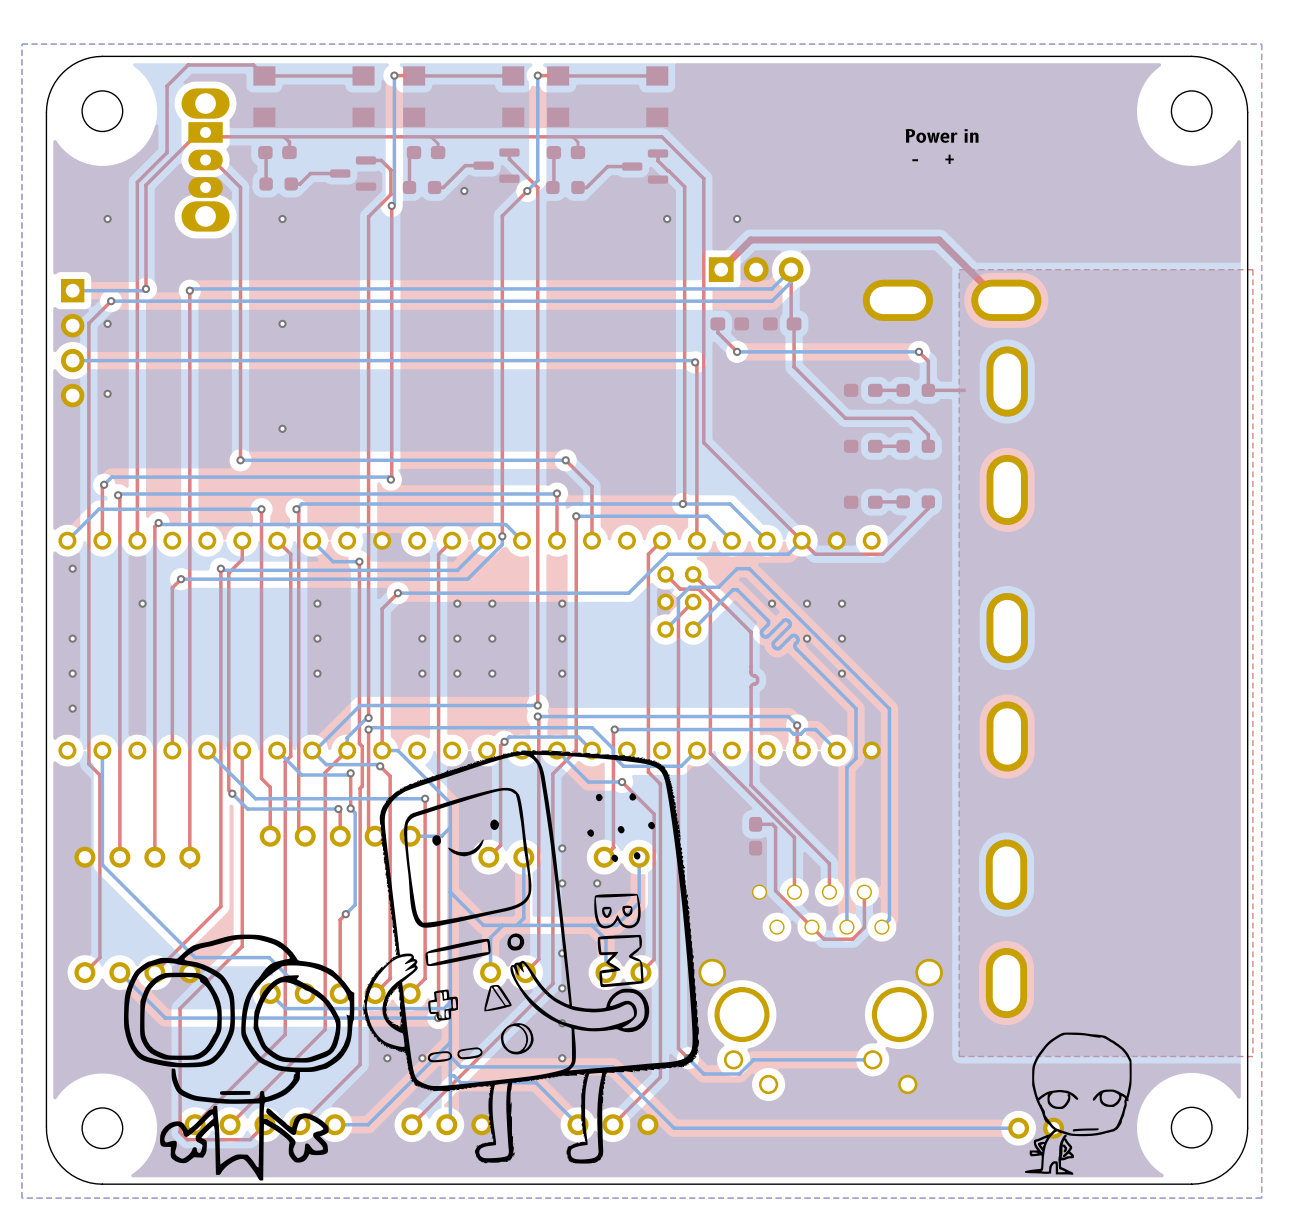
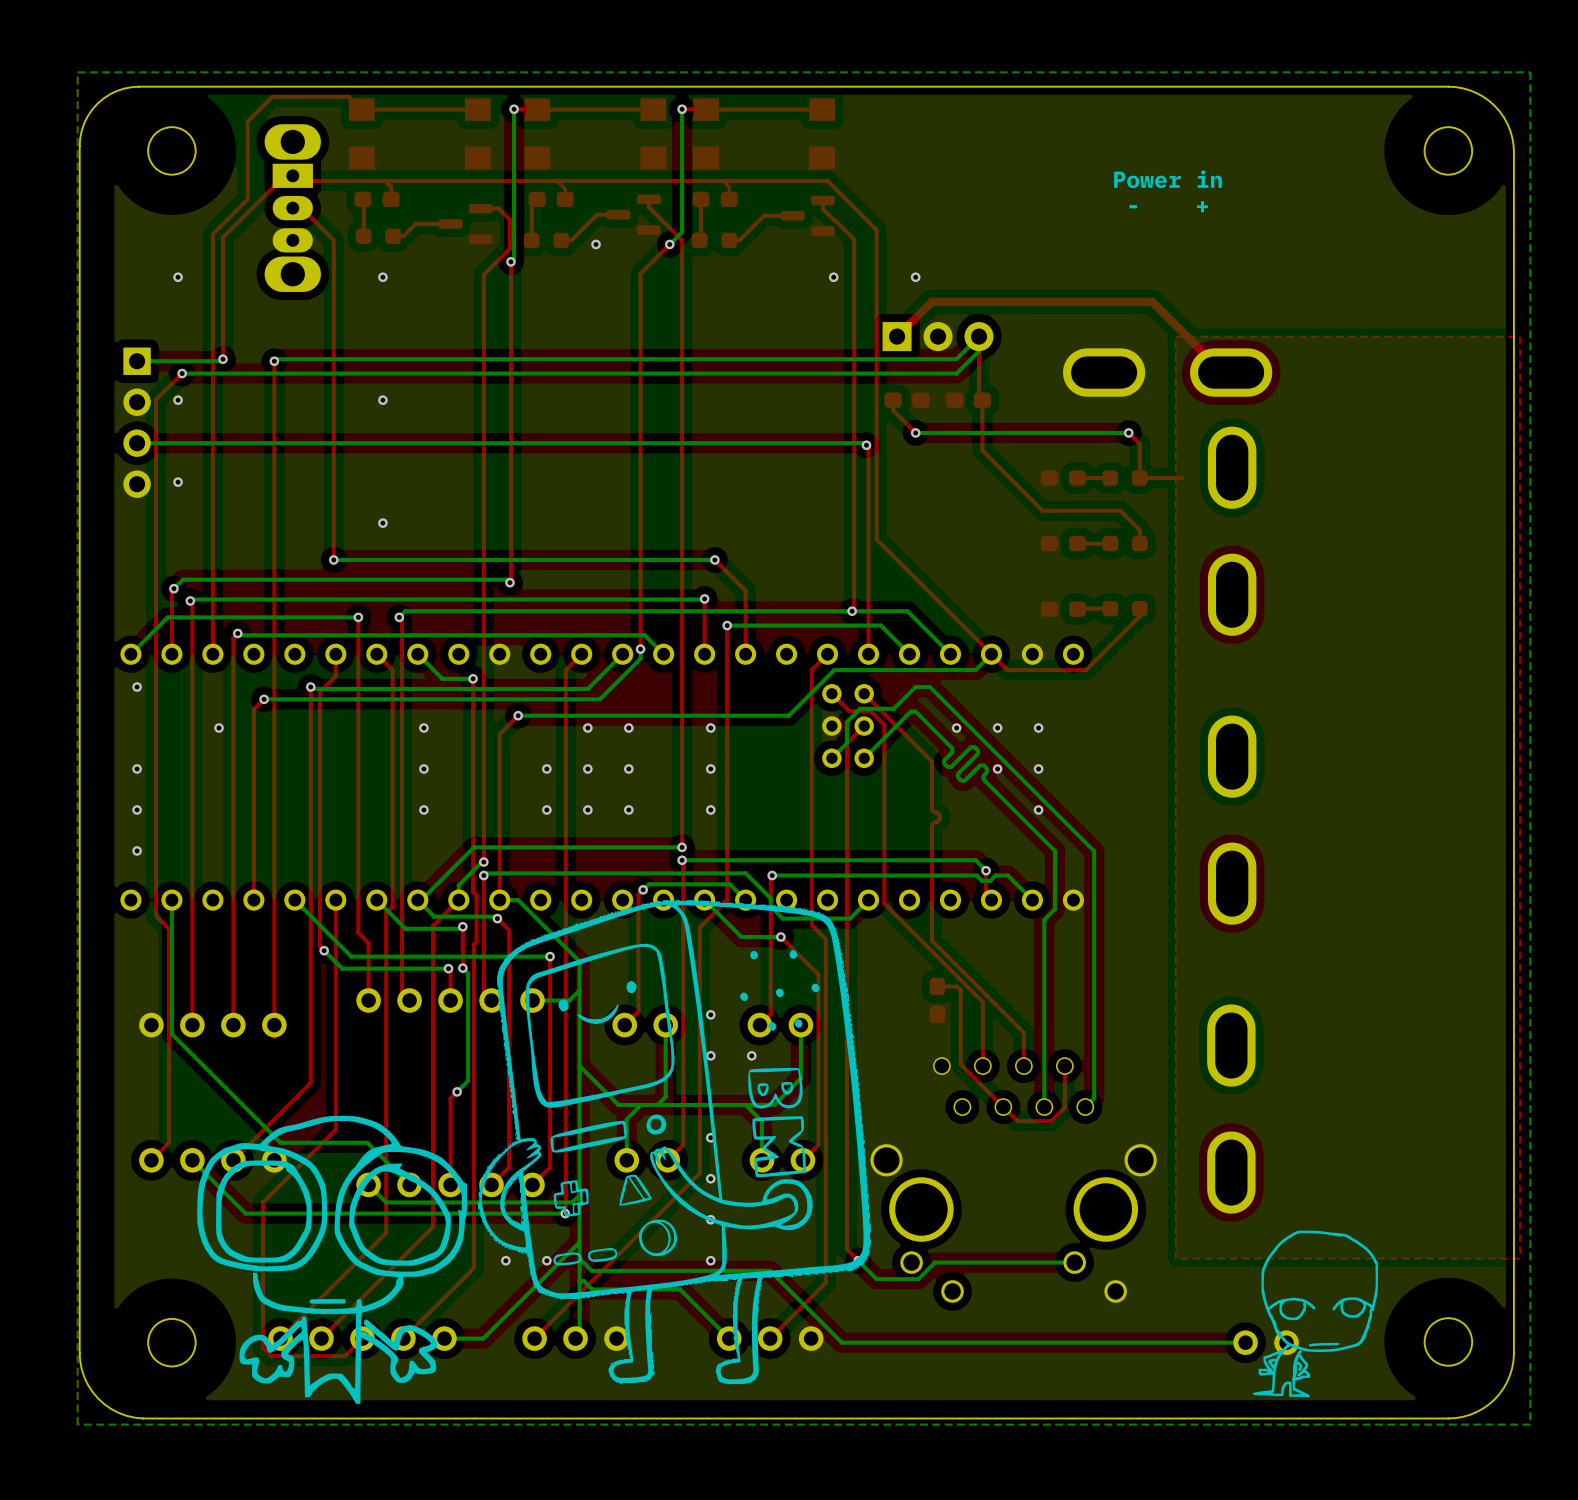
board edge: (102, 56) (83, 59) (62, 72) (49, 93) (46, 112) (46, 1126) -> none
board edge: (46, 1126) (51, 1151) (62, 1167) (77, 1178) (102, 1184) -> none
board edge: (1247, 1128) (1244, 1146) (1231, 1167) (1210, 1181) (1191, 1184) (102, 1184) -> (1513, 1342) (1512, 1367) (1507, 1381) (1499, 1393) (1489, 1404) (1476, 1412) (1462, 1416) (1448, 1418) (143, 1418) (118, 1412) (98, 1398) (84, 1377) (79, 1352) (79, 146) (81, 130) (87, 116) (97, 104) (109, 94) (131, 87) (171, 86)

